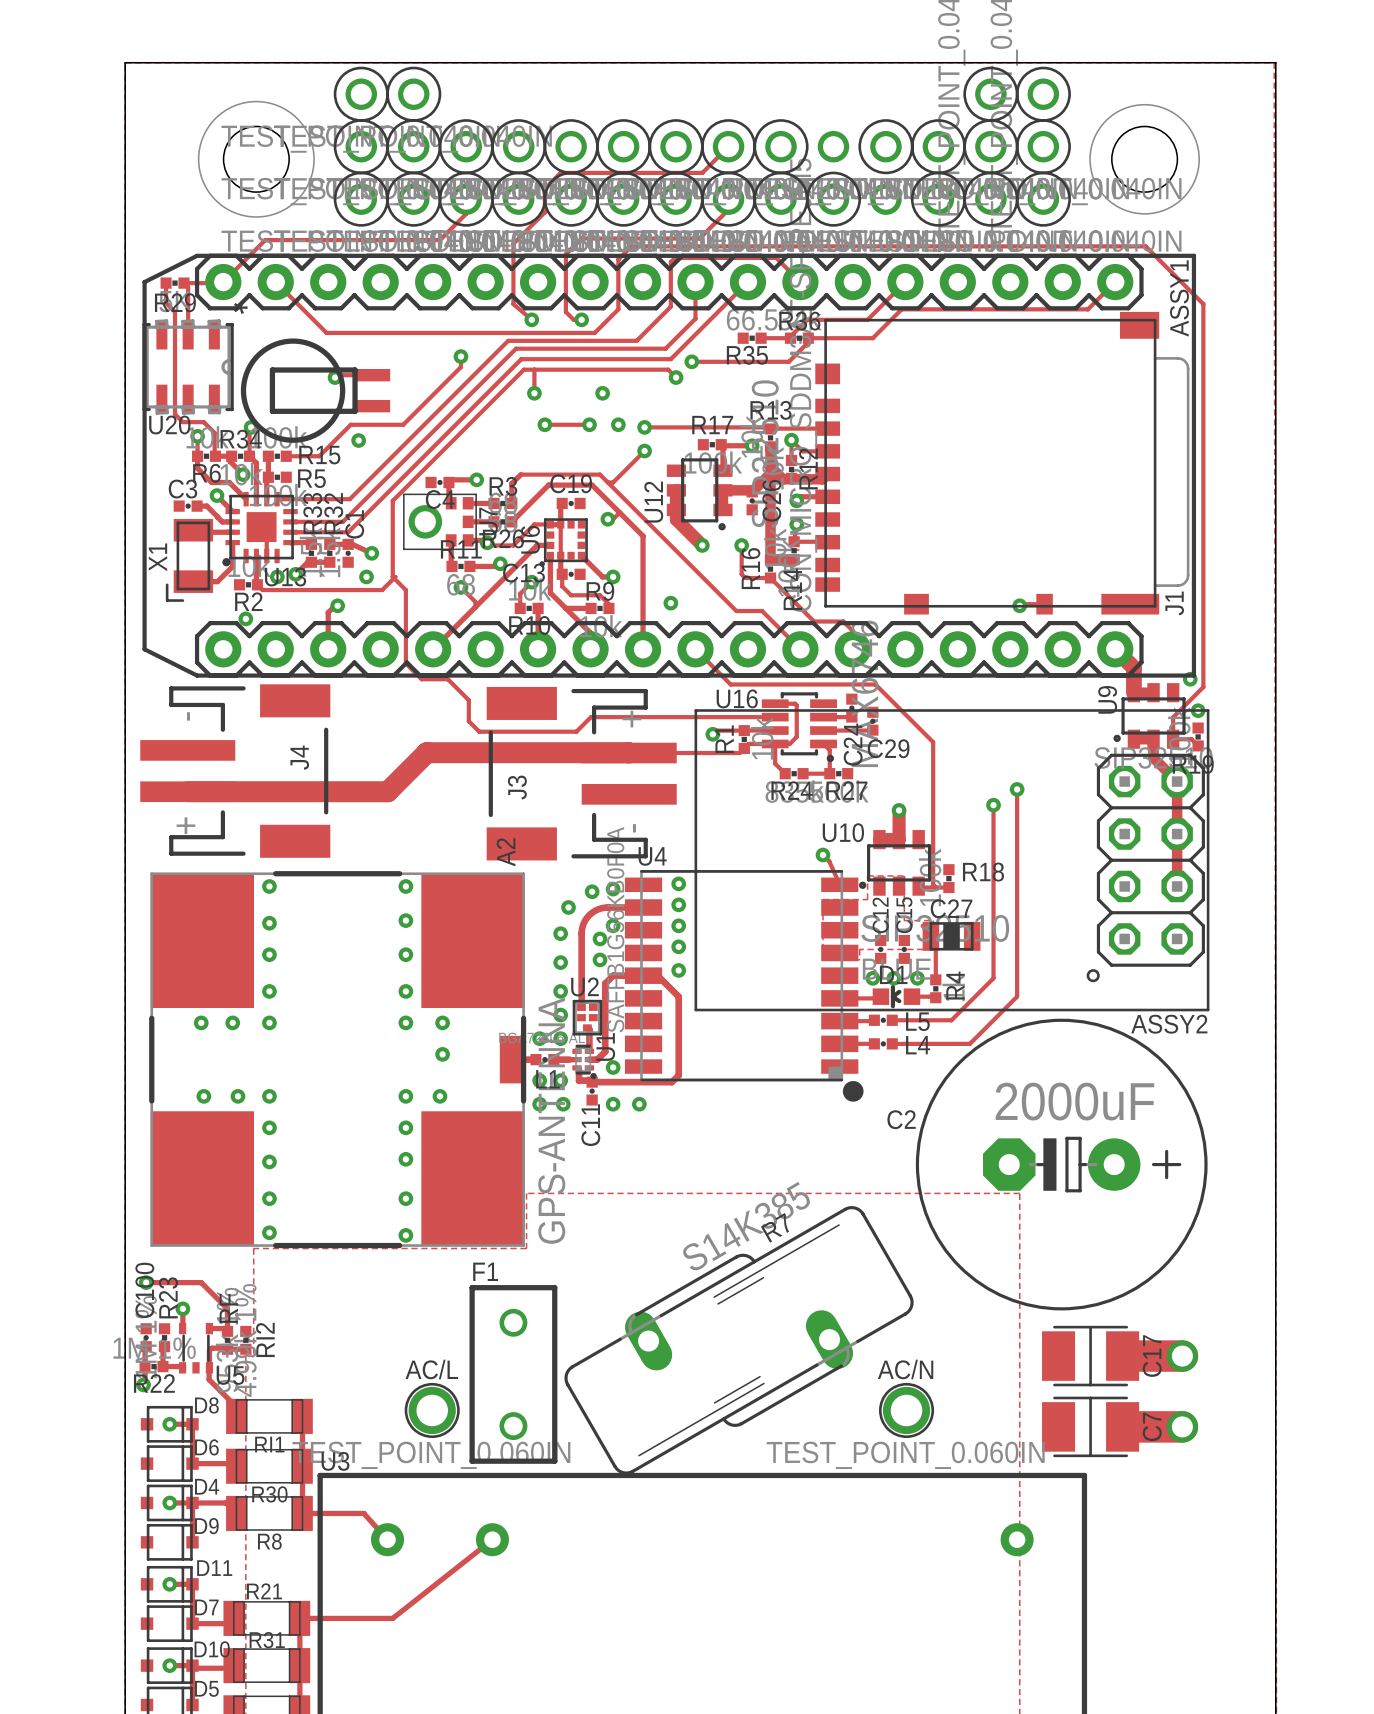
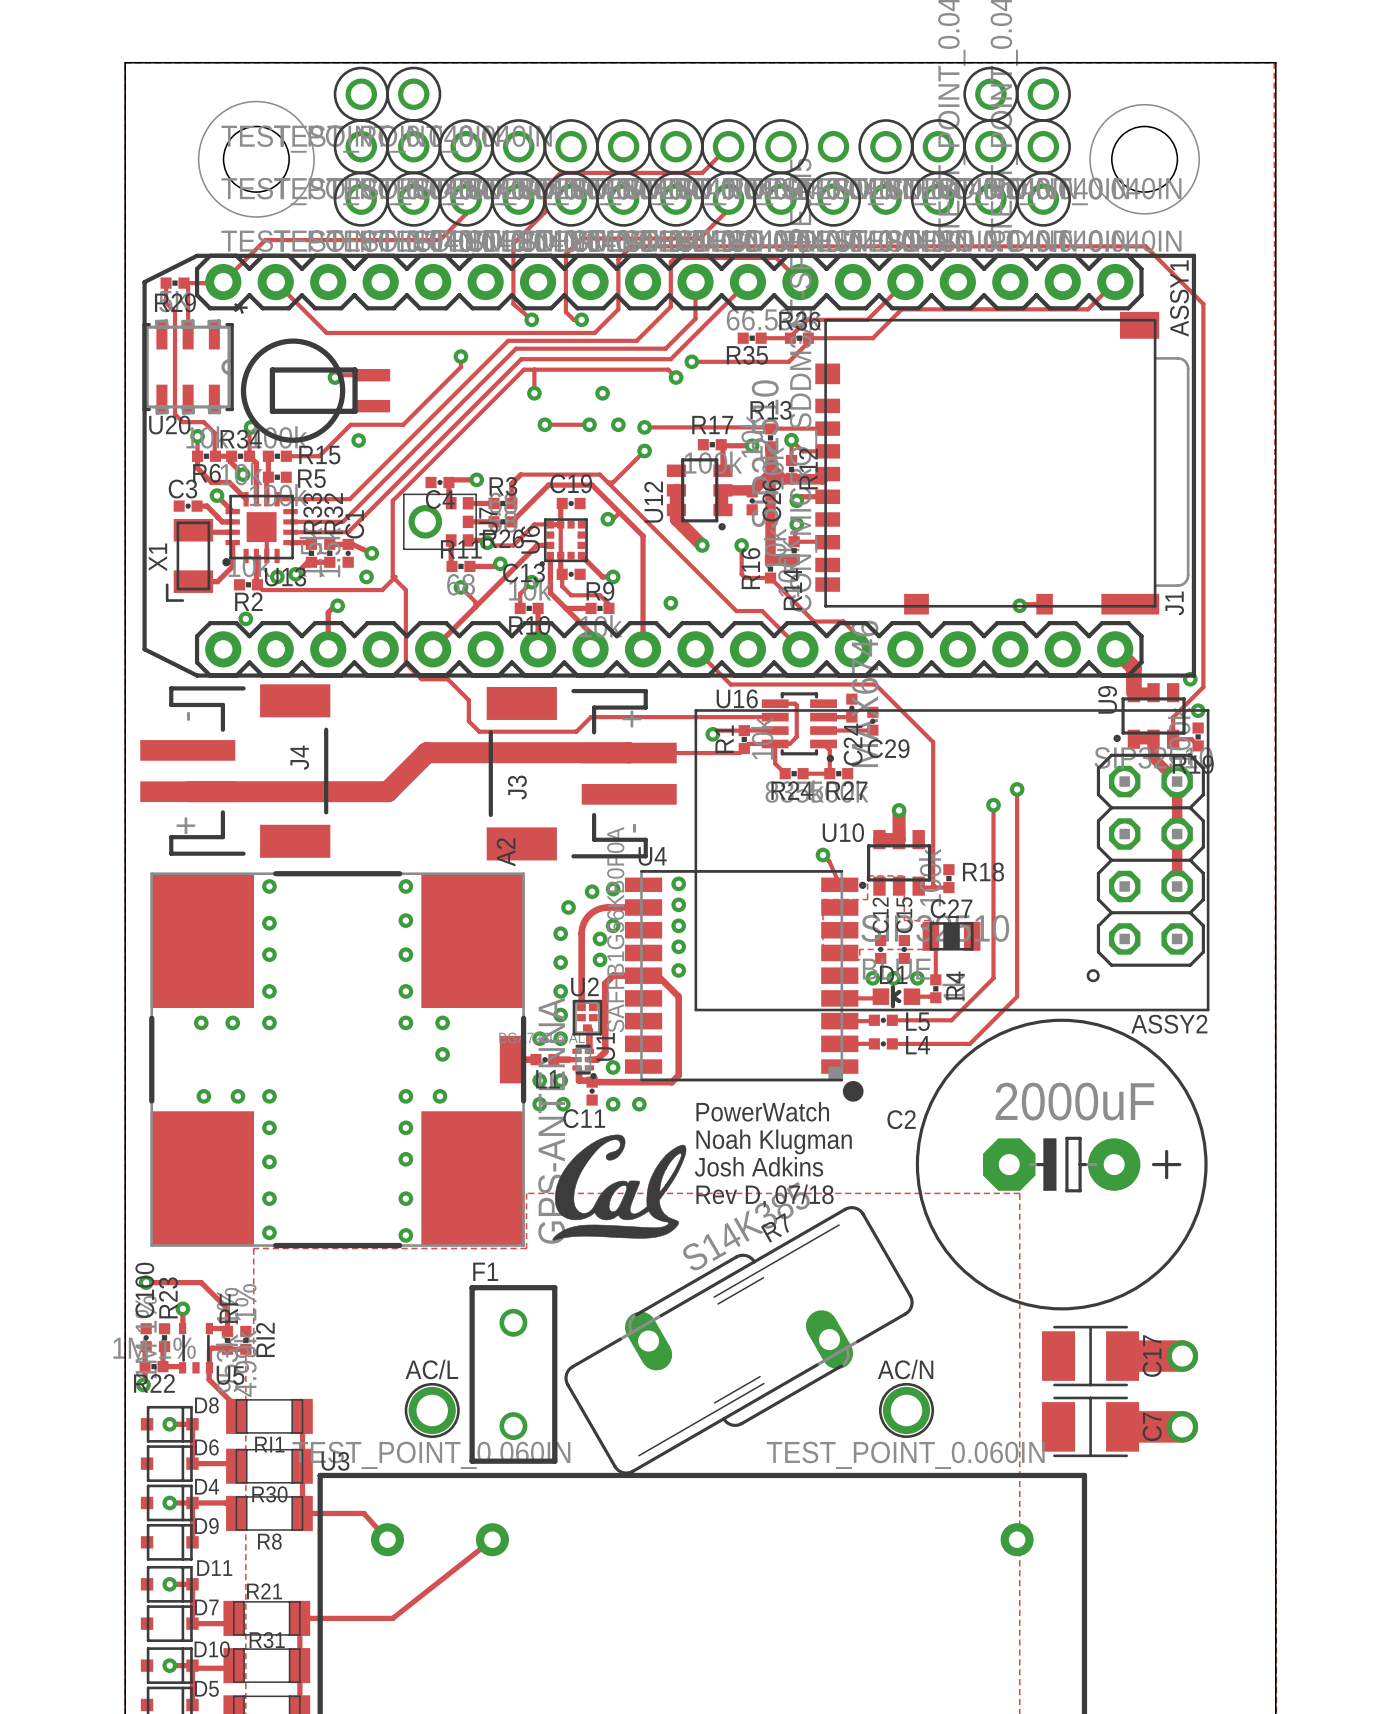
text: none -> PowerWatch (762, 1111)
C11 name rotation: 0° (590, 1125) -> 90° clockwise (584, 1118)
drawing: none -> [552, 1134, 687, 1241]
text: none -> Noah Klugman (774, 1141)
text: none -> Josh Adkins (758, 1166)
text: none -> Rev D, 07/18 (765, 1195)

